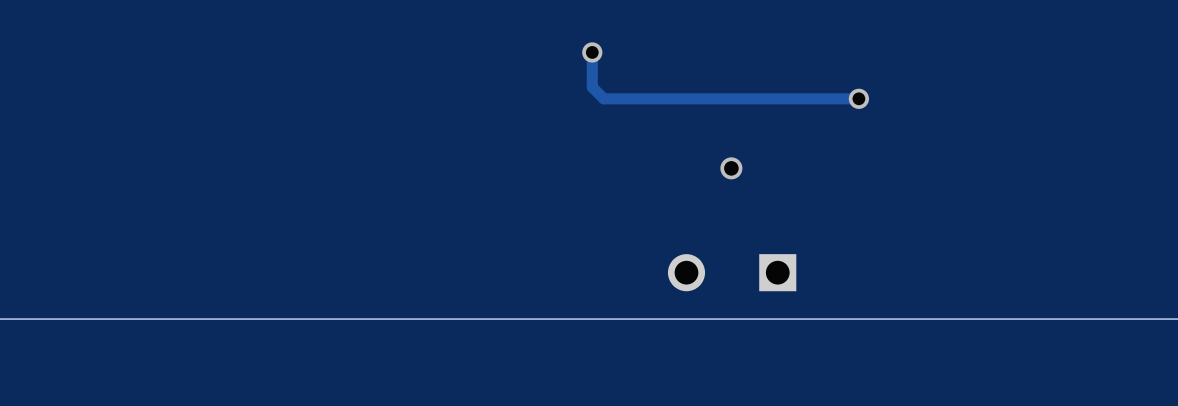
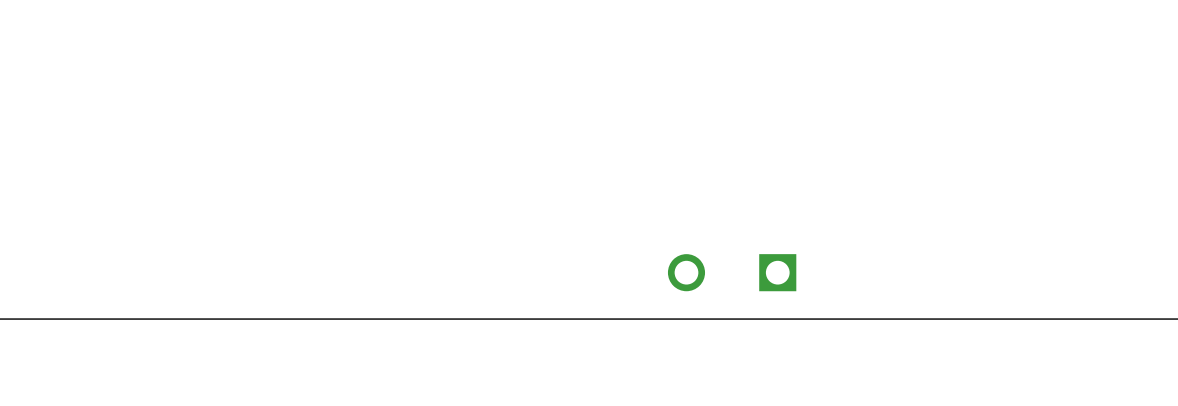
track: (592, 52) (592, 87) (603, 98) (858, 98) -> none
via: (592, 52) -> none
via: (858, 98) -> none
via: (731, 168) -> none

